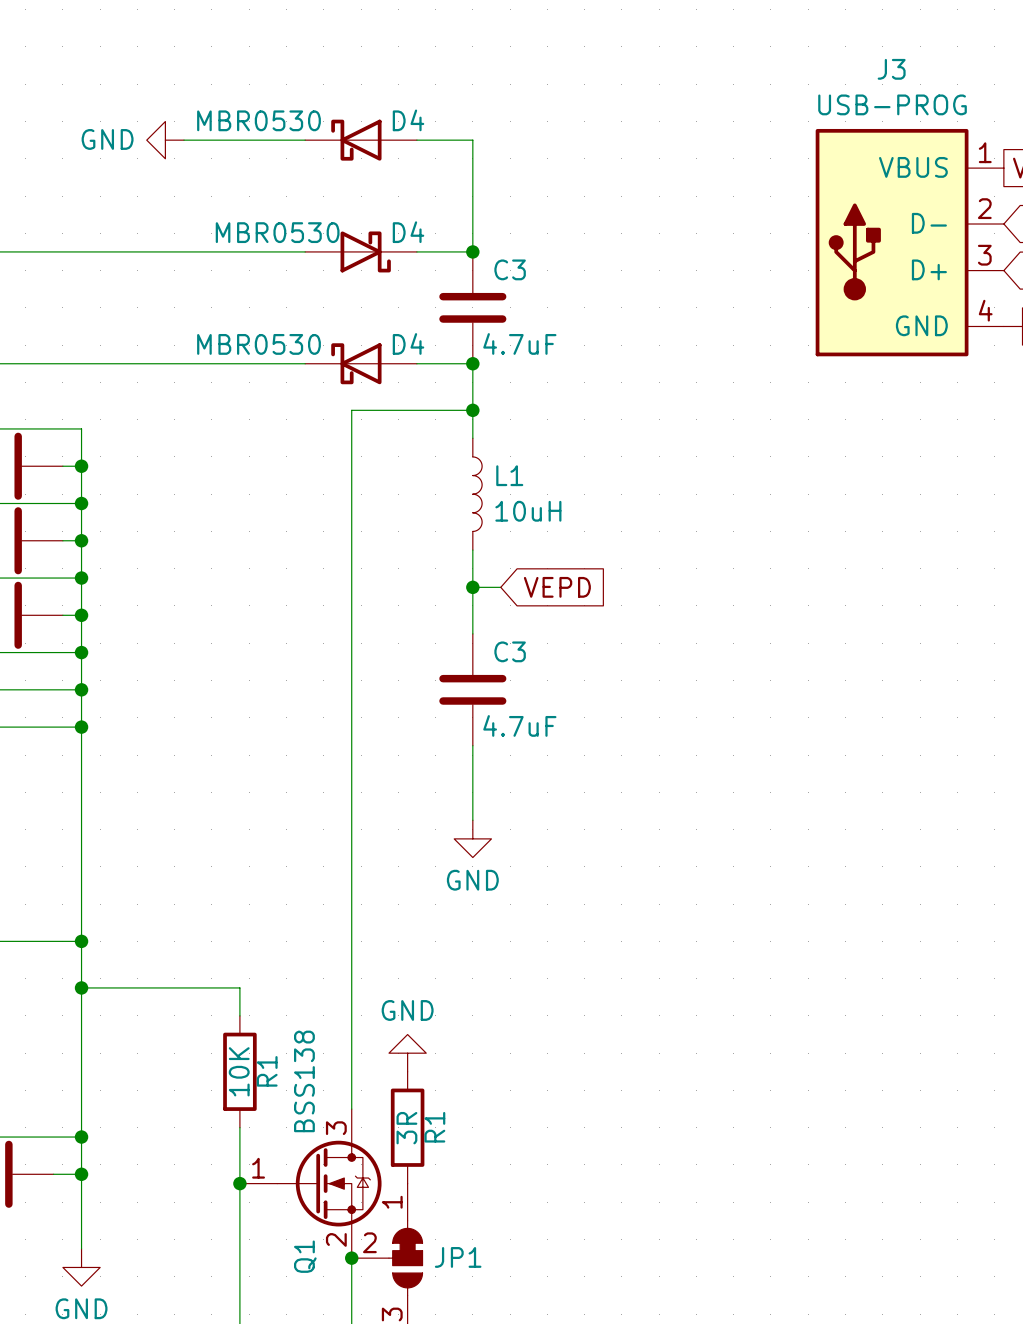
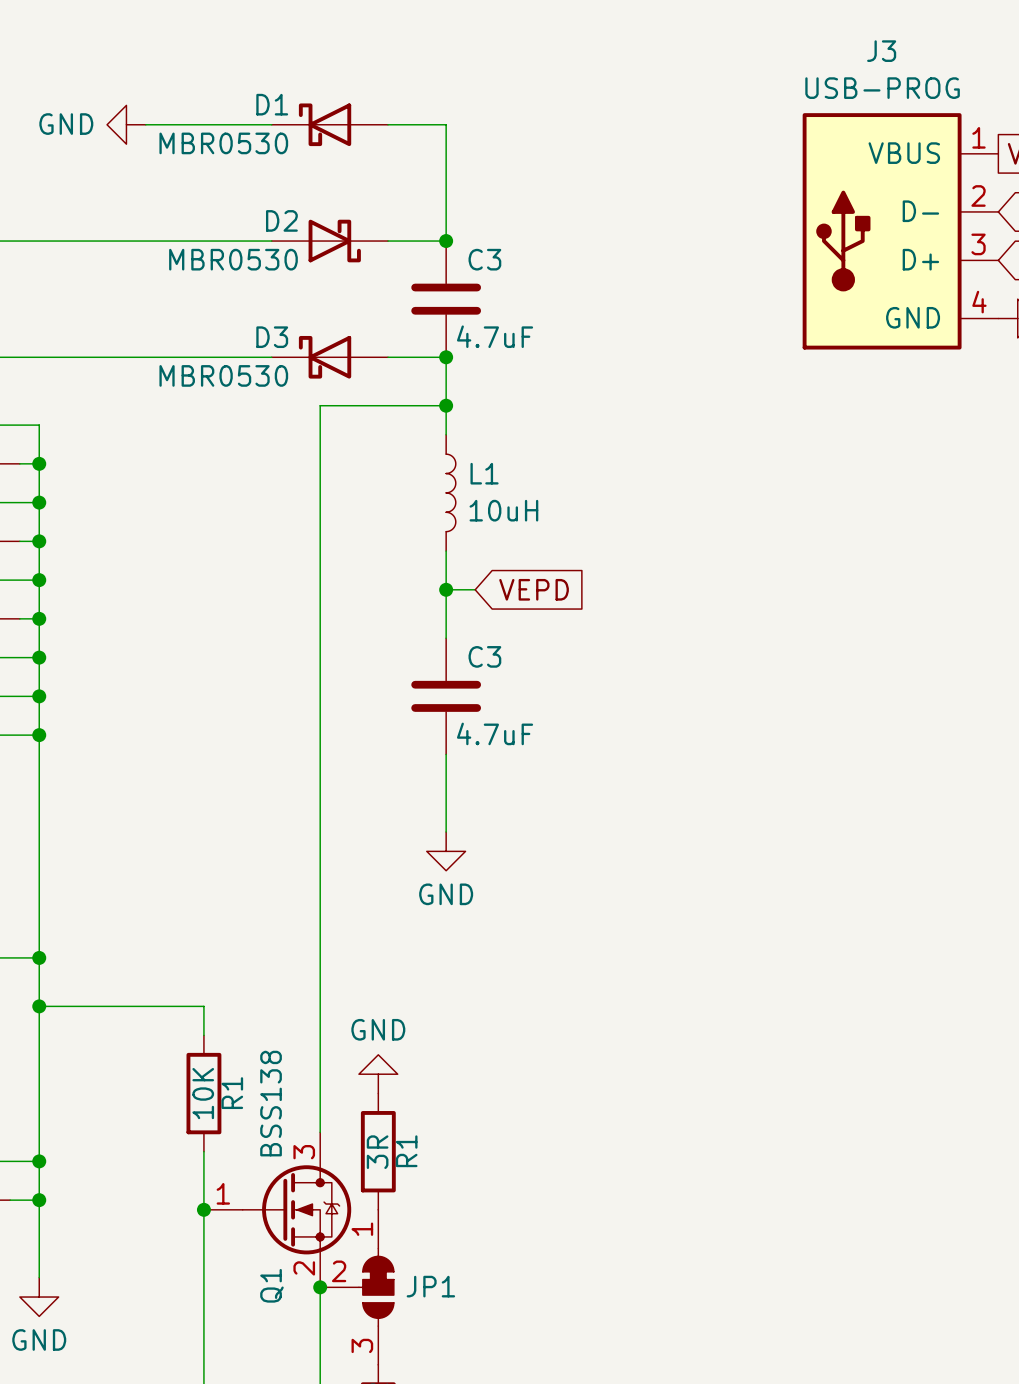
D4 value position: MBR0530 (259, 120) -> MBR0530 (223, 143)
D4 name: D4 (408, 120) -> D1 (272, 104)
D4 value position: MBR0530 (277, 232) -> MBR0530 (233, 259)
D4 name: D4 (408, 232) -> D2 (281, 220)
D4 name: D4 (408, 343) -> D3 (272, 337)
D4 value position: MBR0530 (259, 344) -> MBR0530 (223, 375)

